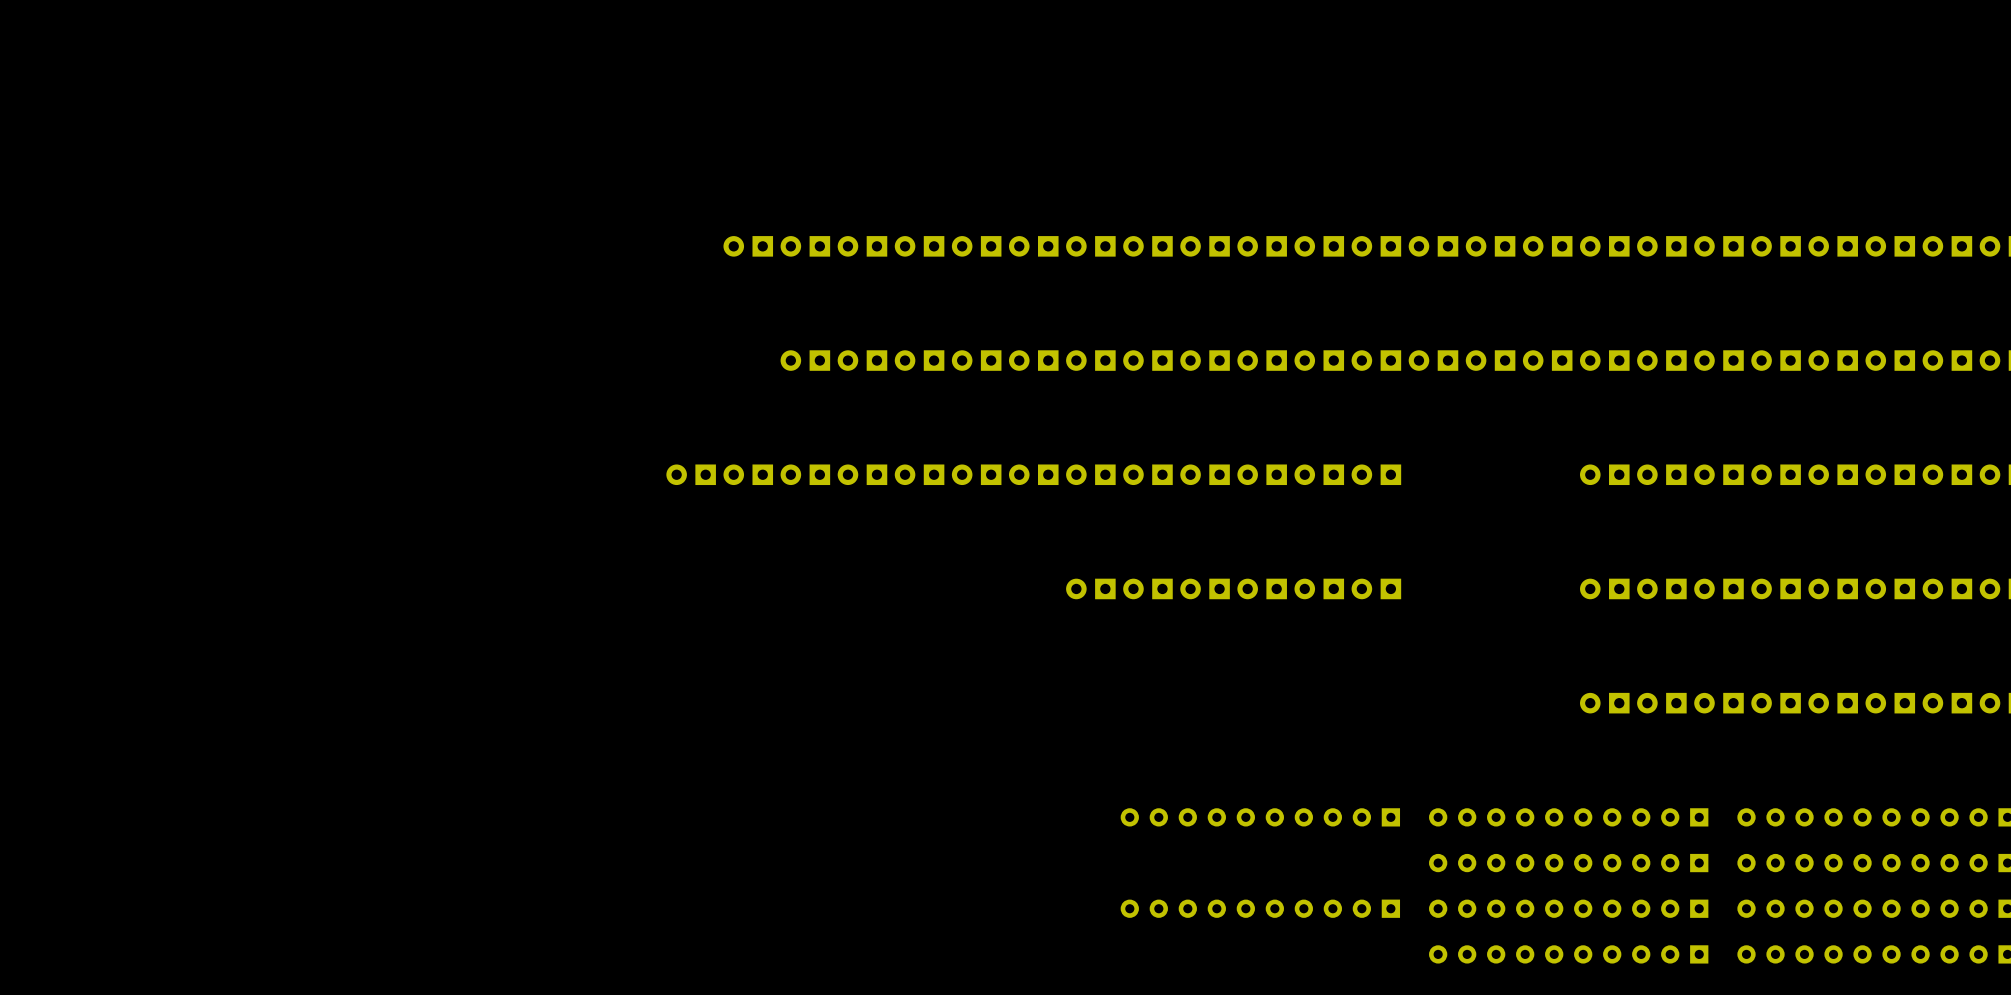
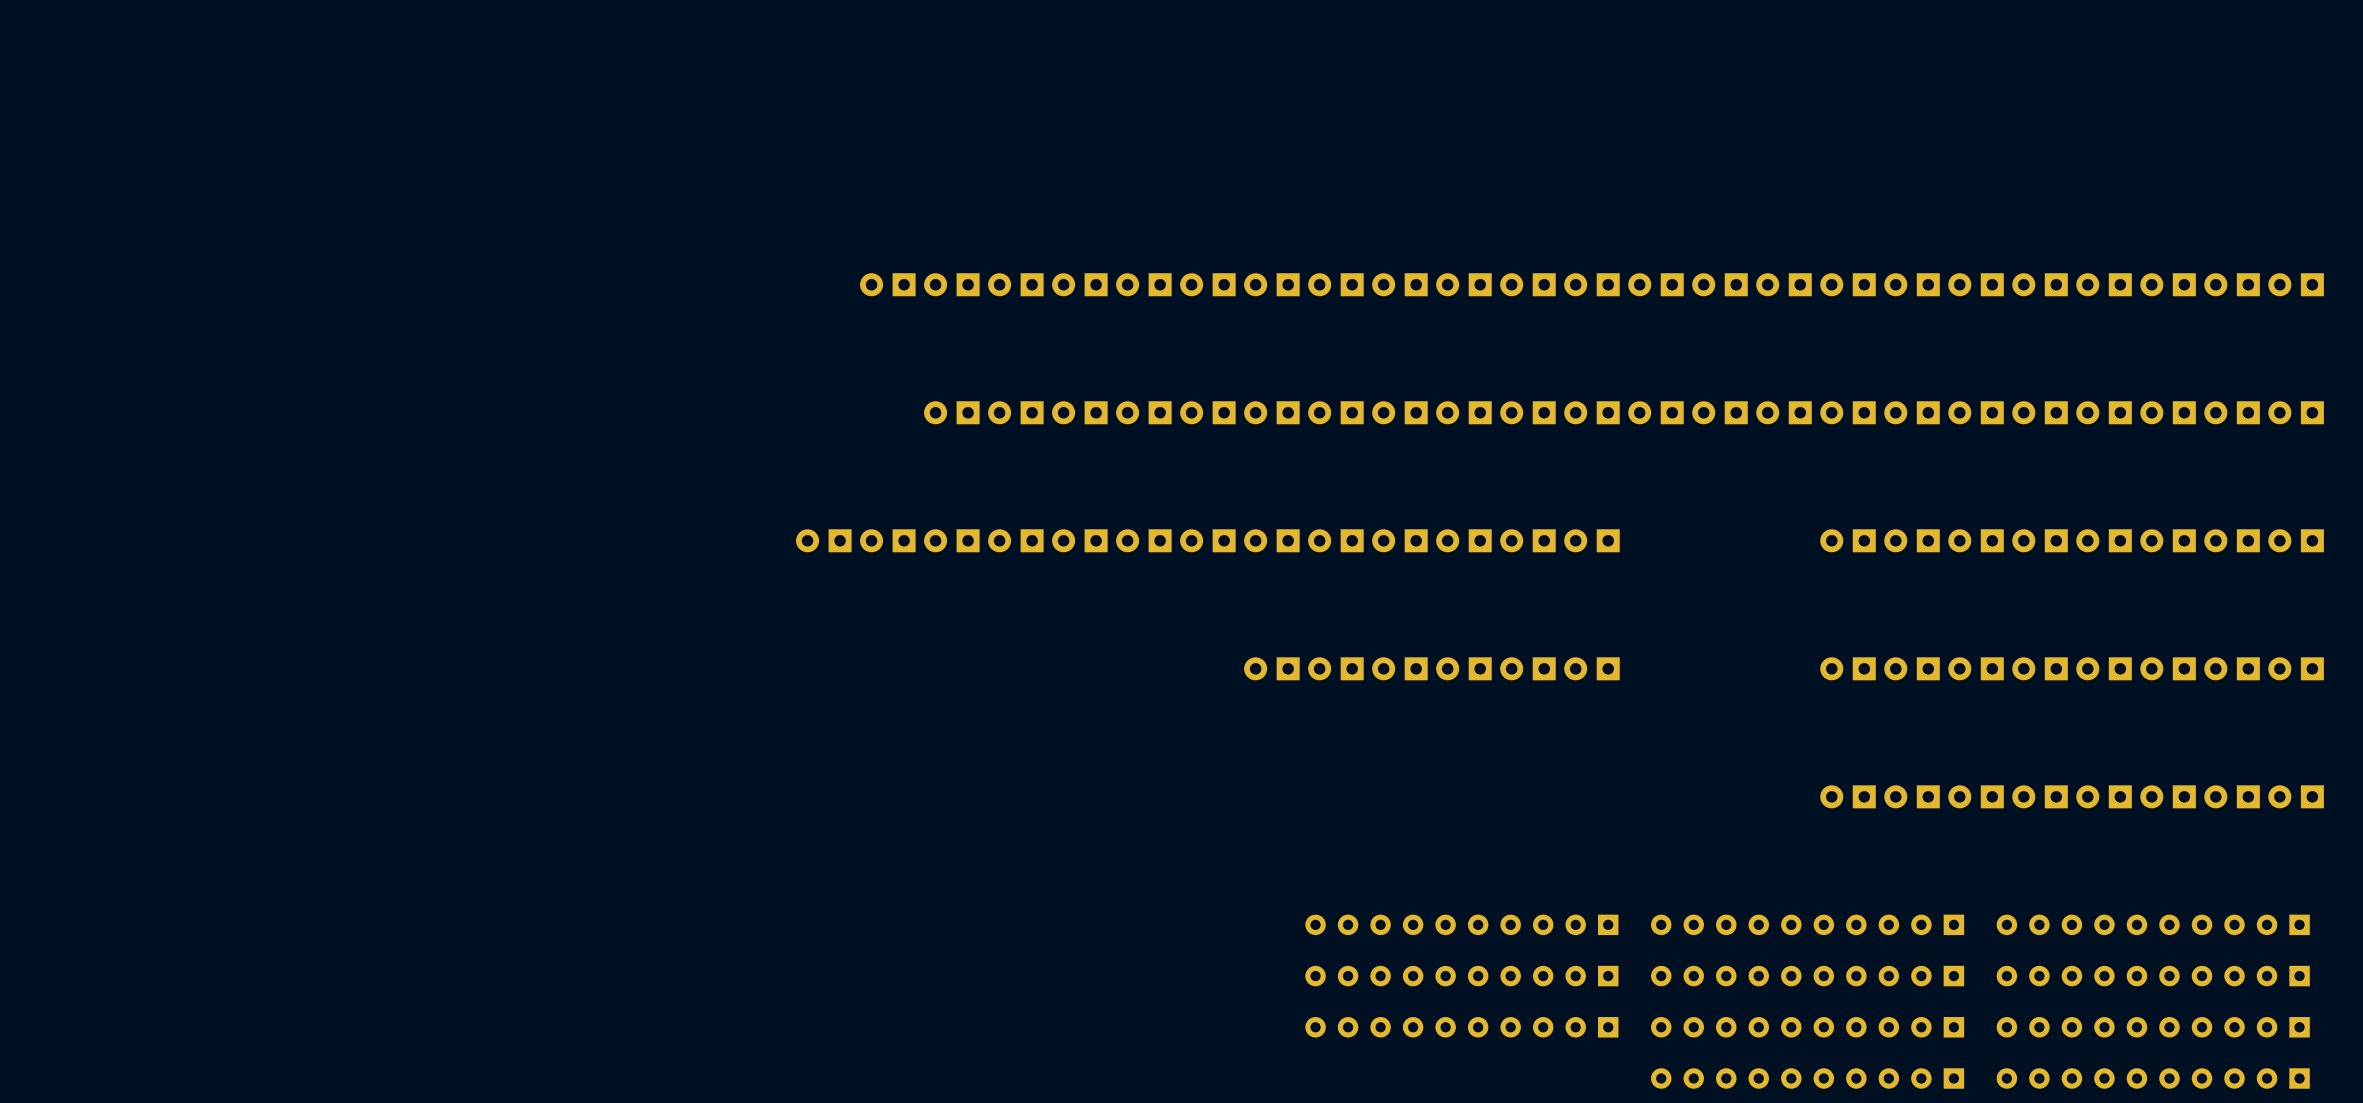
part: none -> (1461, 976)

